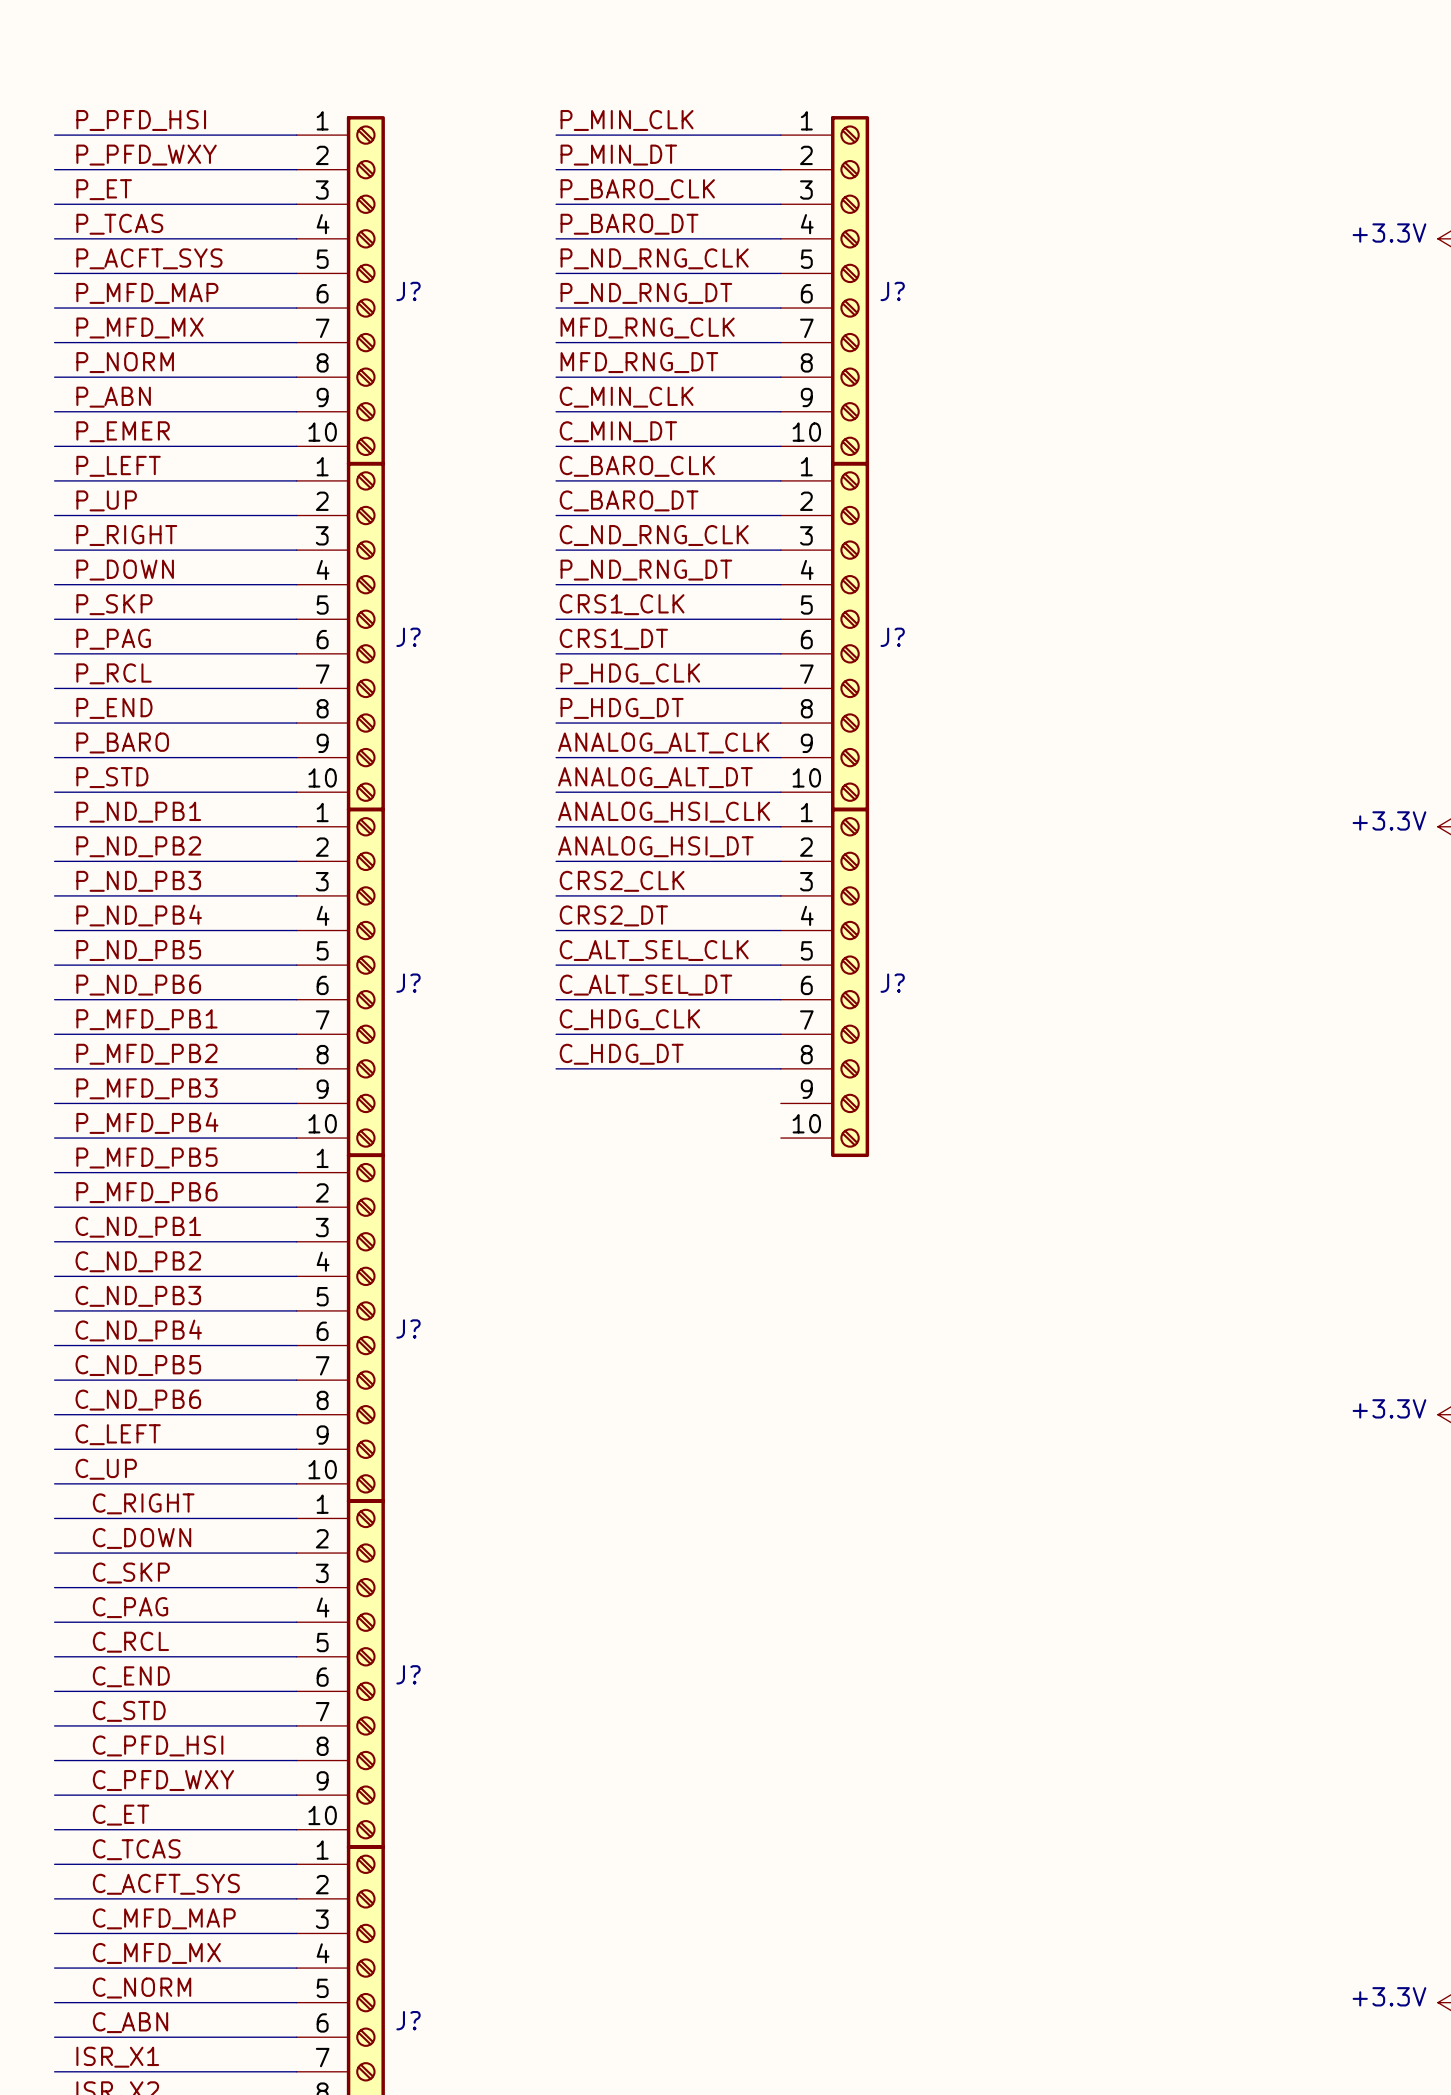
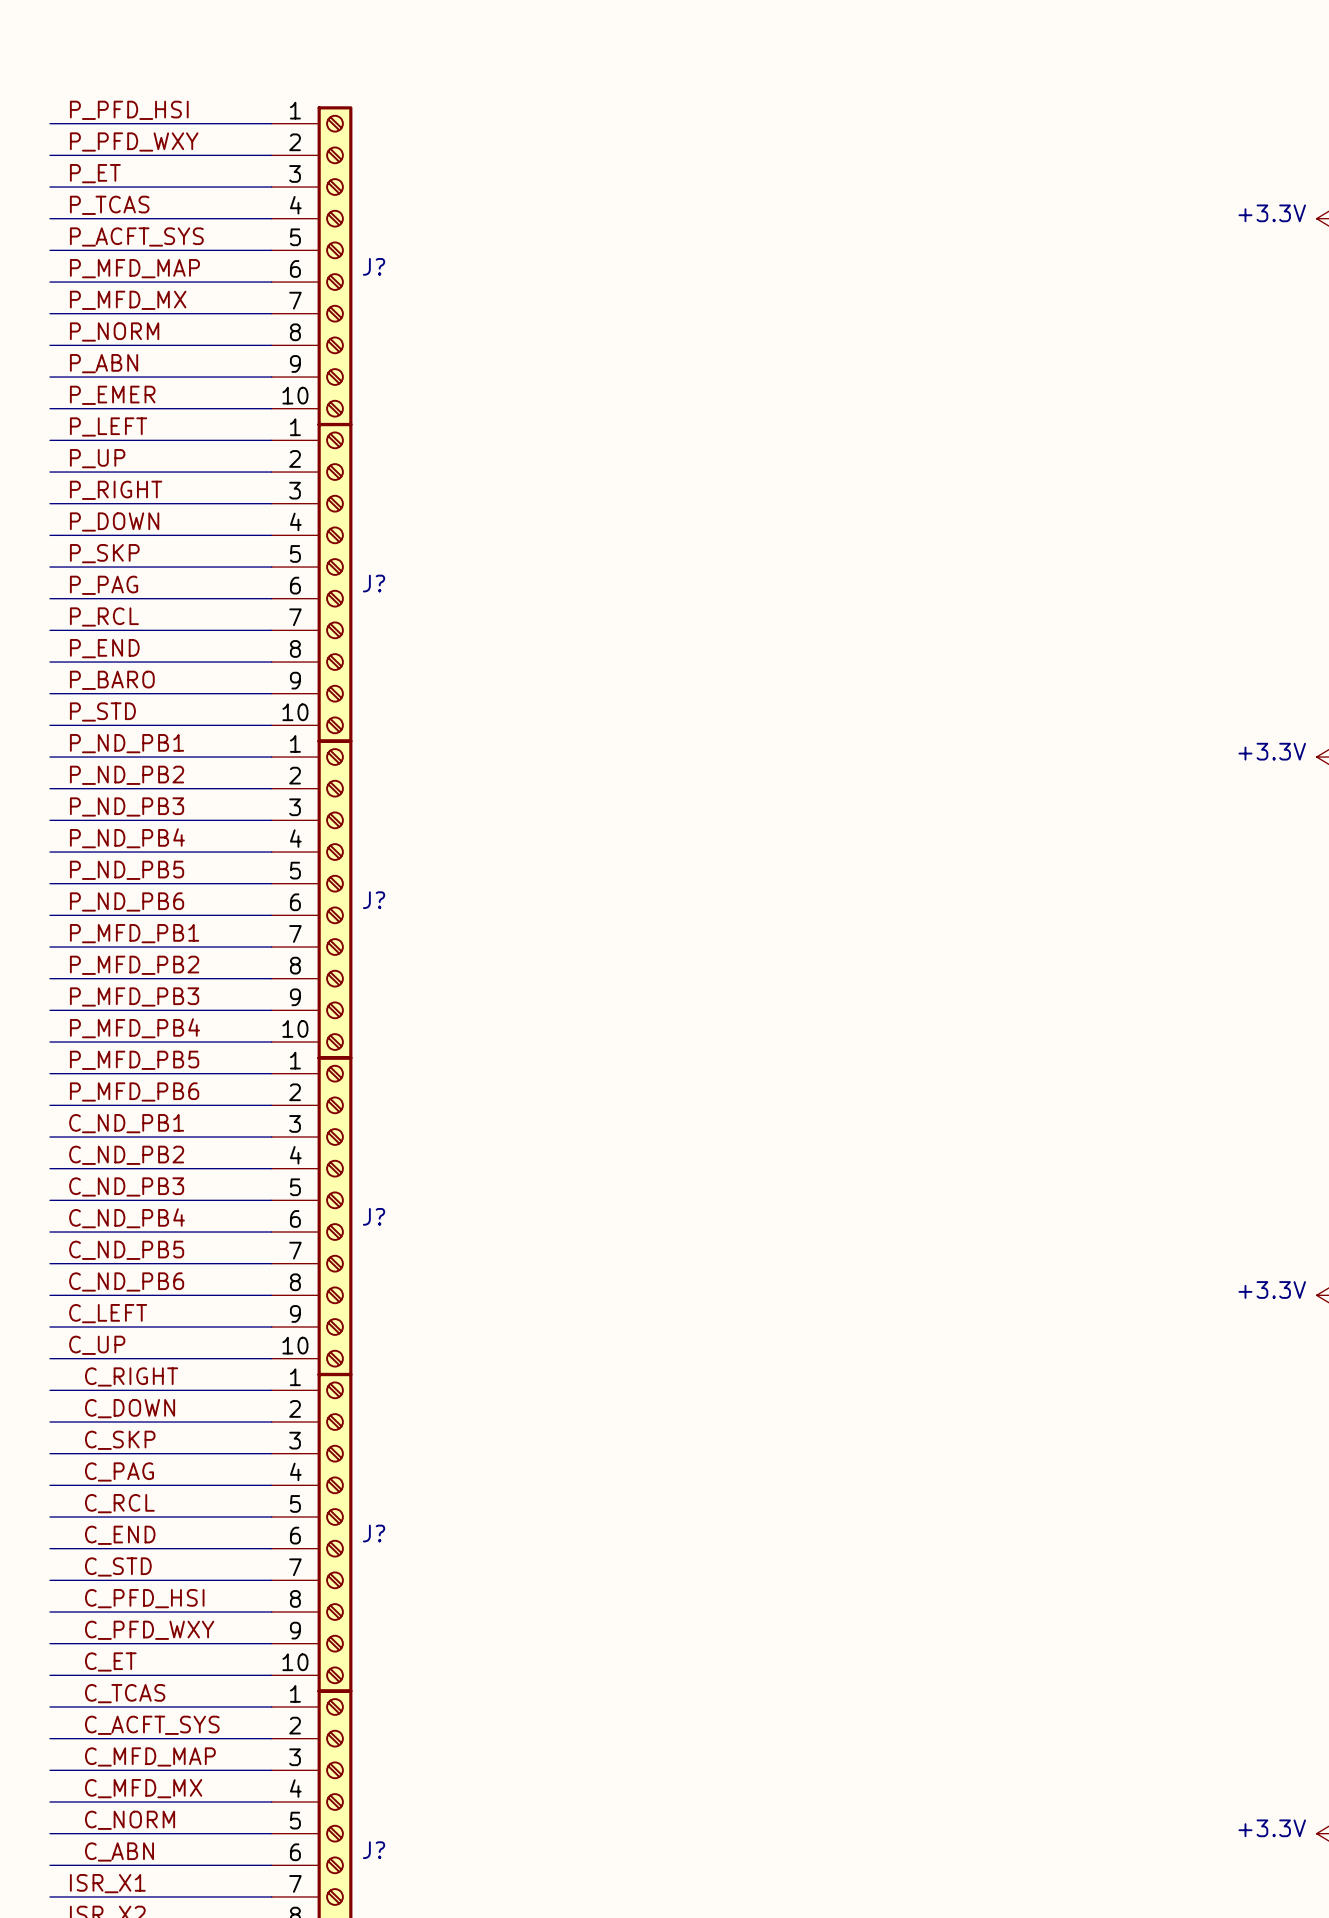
label: P_MIN_CLK (627, 120) -> none
wire: (556, 135) (780, 135) -> none
label: P_MIN_DT (618, 155) -> none
wire: (556, 169) (780, 169) -> none
label: P_BARO_CLK (637, 189) -> none
wire: (556, 204) (780, 204) -> none
label: P_BARO_DT (629, 224) -> none
wire: (556, 238) (780, 238) -> none
label: P_ND_RNG_CLK (654, 258) -> none
wire: (556, 273) (780, 273) -> none
J?: (824, 290) -> none
label: P_ND_RNG_DT (646, 293) -> none
wire: (556, 308) (780, 308) -> none
label: MFD_RNG_CLK (647, 327) -> none
wire: (556, 342) (780, 342) -> none
label: MFD_RNG_DT (639, 362) -> none
wire: (556, 377) (780, 377) -> none
label: C_MIN_CLK (626, 397) -> none
wire: (556, 411) (780, 411) -> none
label: C_MIN_DT (618, 431) -> none
wire: (556, 446) (780, 446) -> none
label: C_BARO_CLK (637, 466) -> none
wire: (556, 480) (780, 480) -> none
label: C_BARO_DT (629, 500) -> none
wire: (556, 515) (780, 515) -> none
label: C_ND_RNG_CLK (654, 535) -> none
wire: (556, 550) (780, 550) -> none
label: P_ND_RNG_DT (646, 570) -> none
wire: (556, 584) (780, 584) -> none
label: CRS1_CLK (622, 604) -> none
wire: (556, 619) (780, 619) -> none
J?: (824, 636) -> none
label: CRS1_DT (613, 639) -> none
wire: (556, 653) (780, 653) -> none
label: P_HDG_CLK (630, 673) -> none
wire: (556, 688) (780, 688) -> none
label: P_HDG_DT (622, 708) -> none
wire: (556, 723) (780, 723) -> none
label: ANALOG_ALT_CLK (663, 743) -> none
wire: (556, 757) (780, 757) -> none
label: ANALOG_ALT_DT (655, 777) -> none
wire: (556, 792) (780, 792) -> none
label: ANALOG_HSI_CLK (664, 812) -> none
wire: (556, 826) (780, 826) -> none
label: ANALOG_HSI_DT (655, 846) -> none
wire: (556, 861) (780, 861) -> none
label: CRS2_CLK (622, 881) -> none
wire: (556, 895) (780, 895) -> none
label: CRS2_DT (613, 915) -> none
wire: (556, 930) (780, 930) -> none
label: C_ALT_SEL_CLK (654, 950) -> none
wire: (556, 965) (780, 965) -> none
J?: (824, 982) -> none
label: C_ALT_SEL_DT (645, 985) -> none
wire: (556, 999) (780, 999) -> none
label: C_HDG_CLK (629, 1019) -> none
wire: (556, 1034) (780, 1034) -> none
label: C_HDG_DT (621, 1054) -> none
wire: (556, 1068) (780, 1068) -> none

